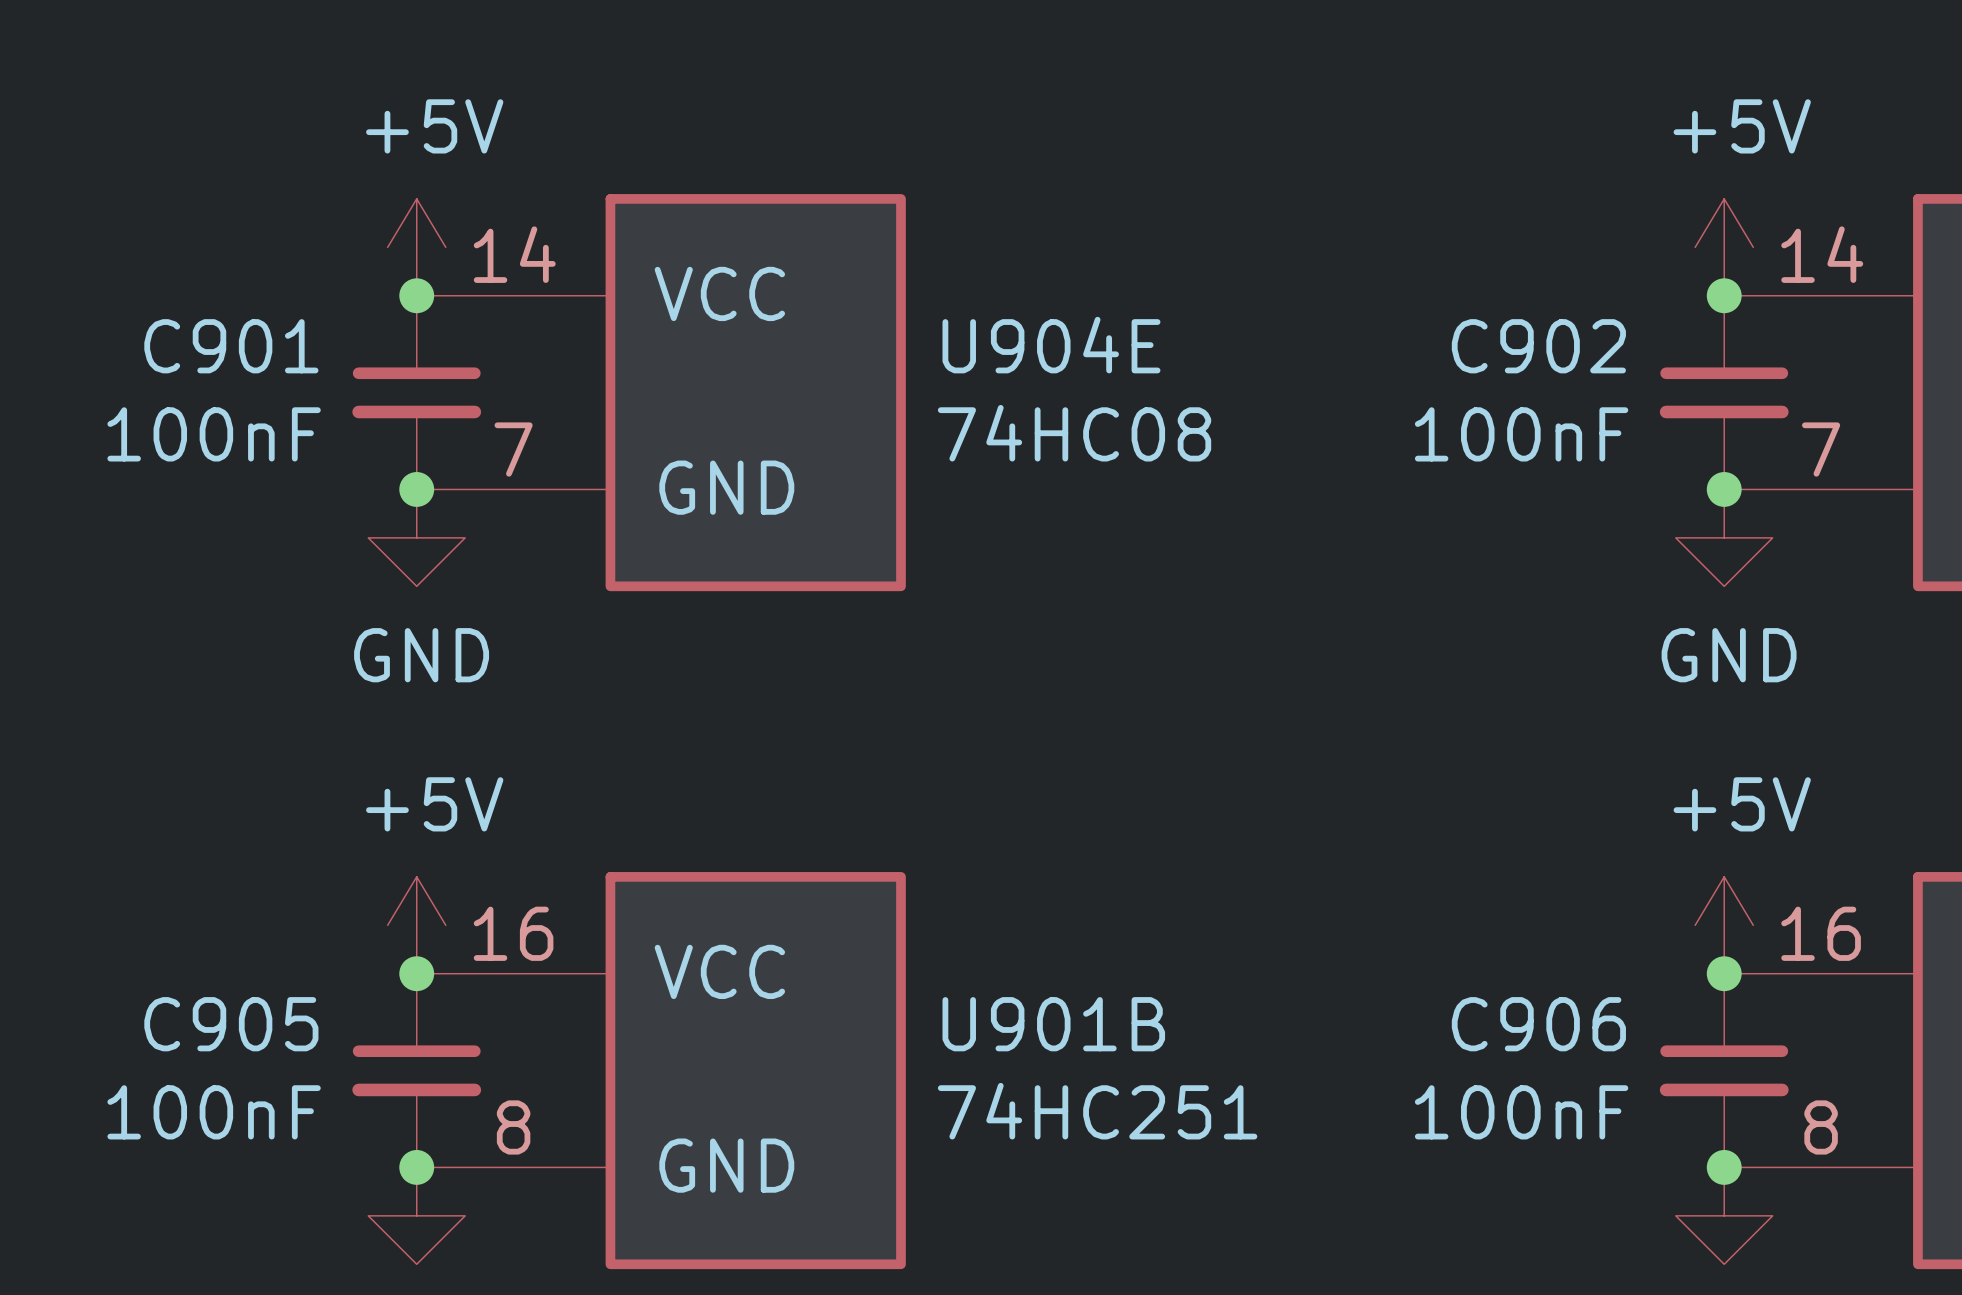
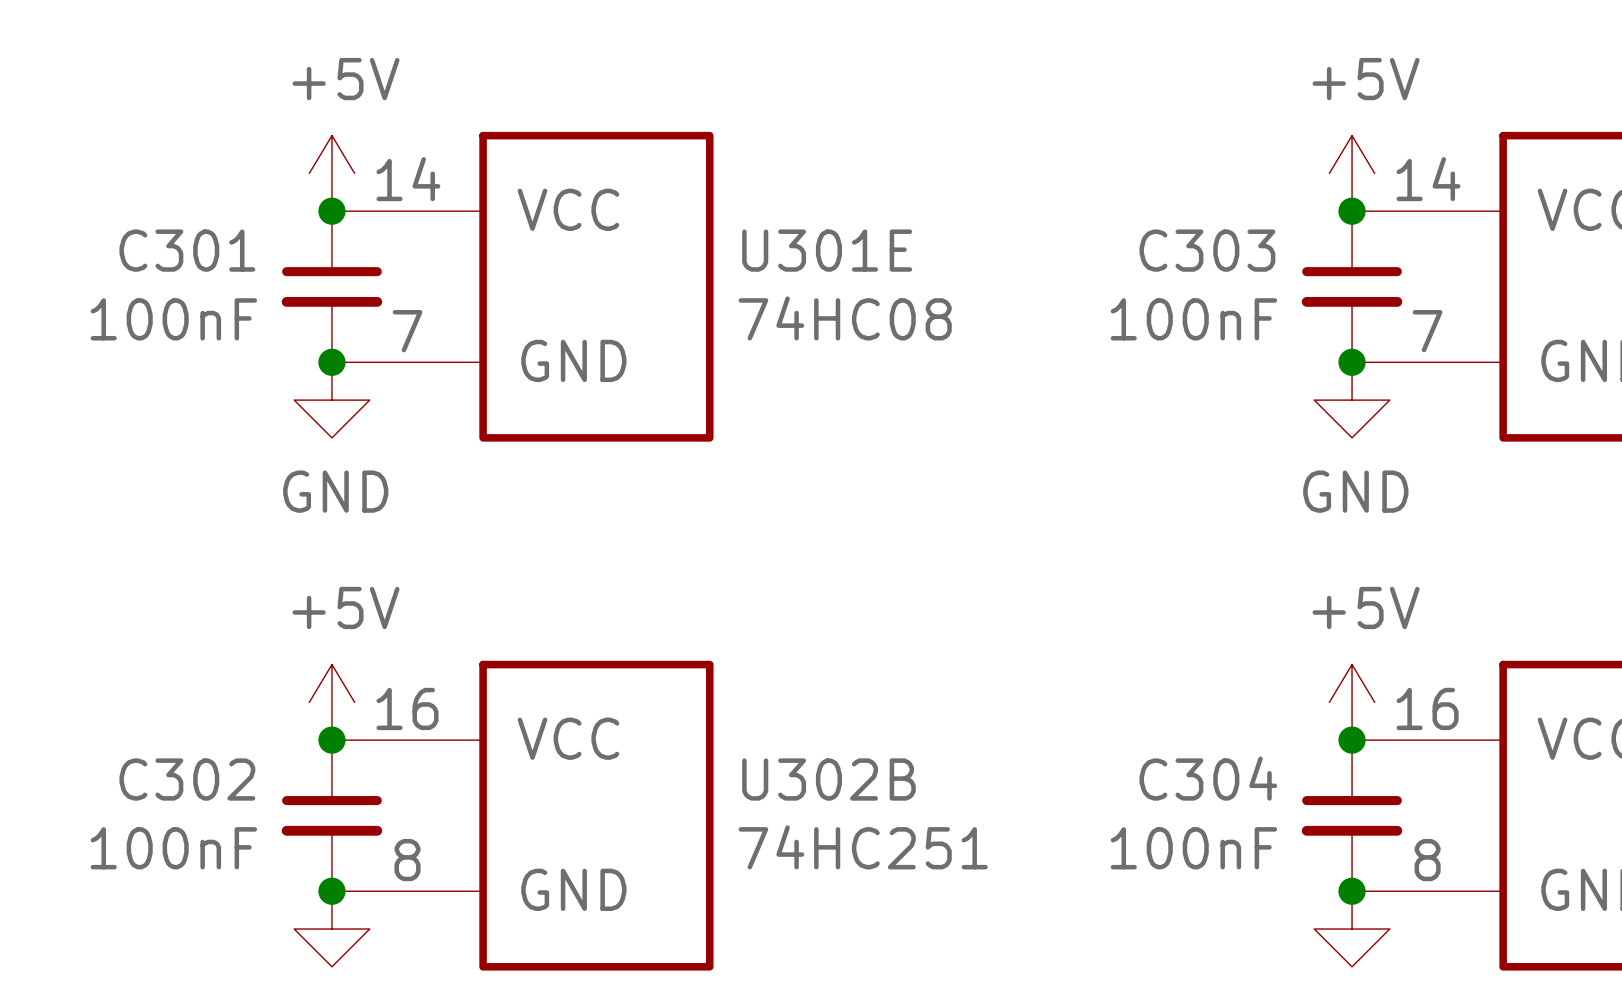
U904E name: U904E (1051, 345) -> U301E (827, 250)
C901 name: C901 (231, 346) -> C301 (187, 250)
C902 name: C902 (1538, 346) -> C303 (1207, 250)
C905 name: C905 (231, 1024) -> C302 (187, 779)
U901B name: U901B (1053, 1024) -> U302B (828, 779)
C906 name: C906 (1538, 1024) -> C304 (1208, 778)

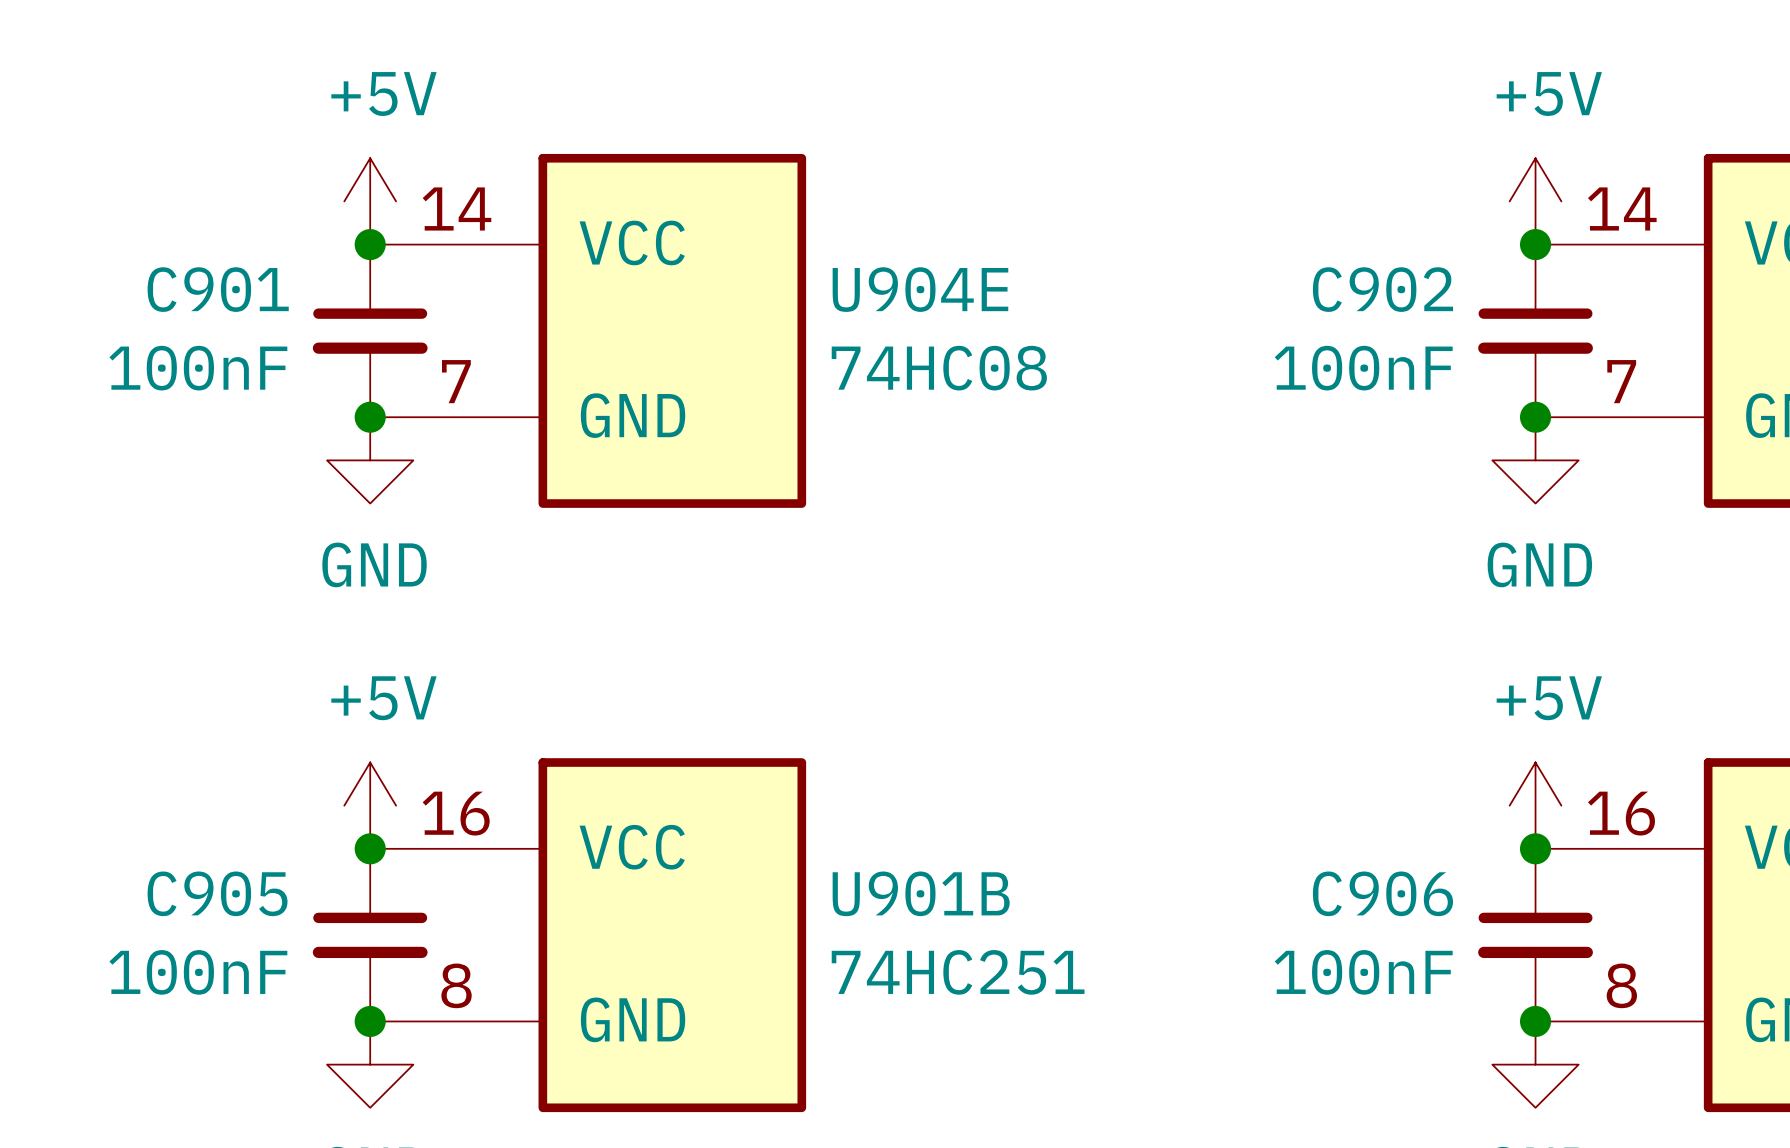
C301 name: C301 (187, 250) -> C901 (218, 289)
U301E name: U301E (827, 250) -> U904E (920, 289)
C303 name: C303 (1207, 250) -> C902 (1382, 289)
C304 name: C304 (1208, 778) -> C906 (1382, 893)
C302 name: C302 (187, 779) -> C905 (217, 893)
U302B name: U302B (828, 779) -> U901B (921, 893)

